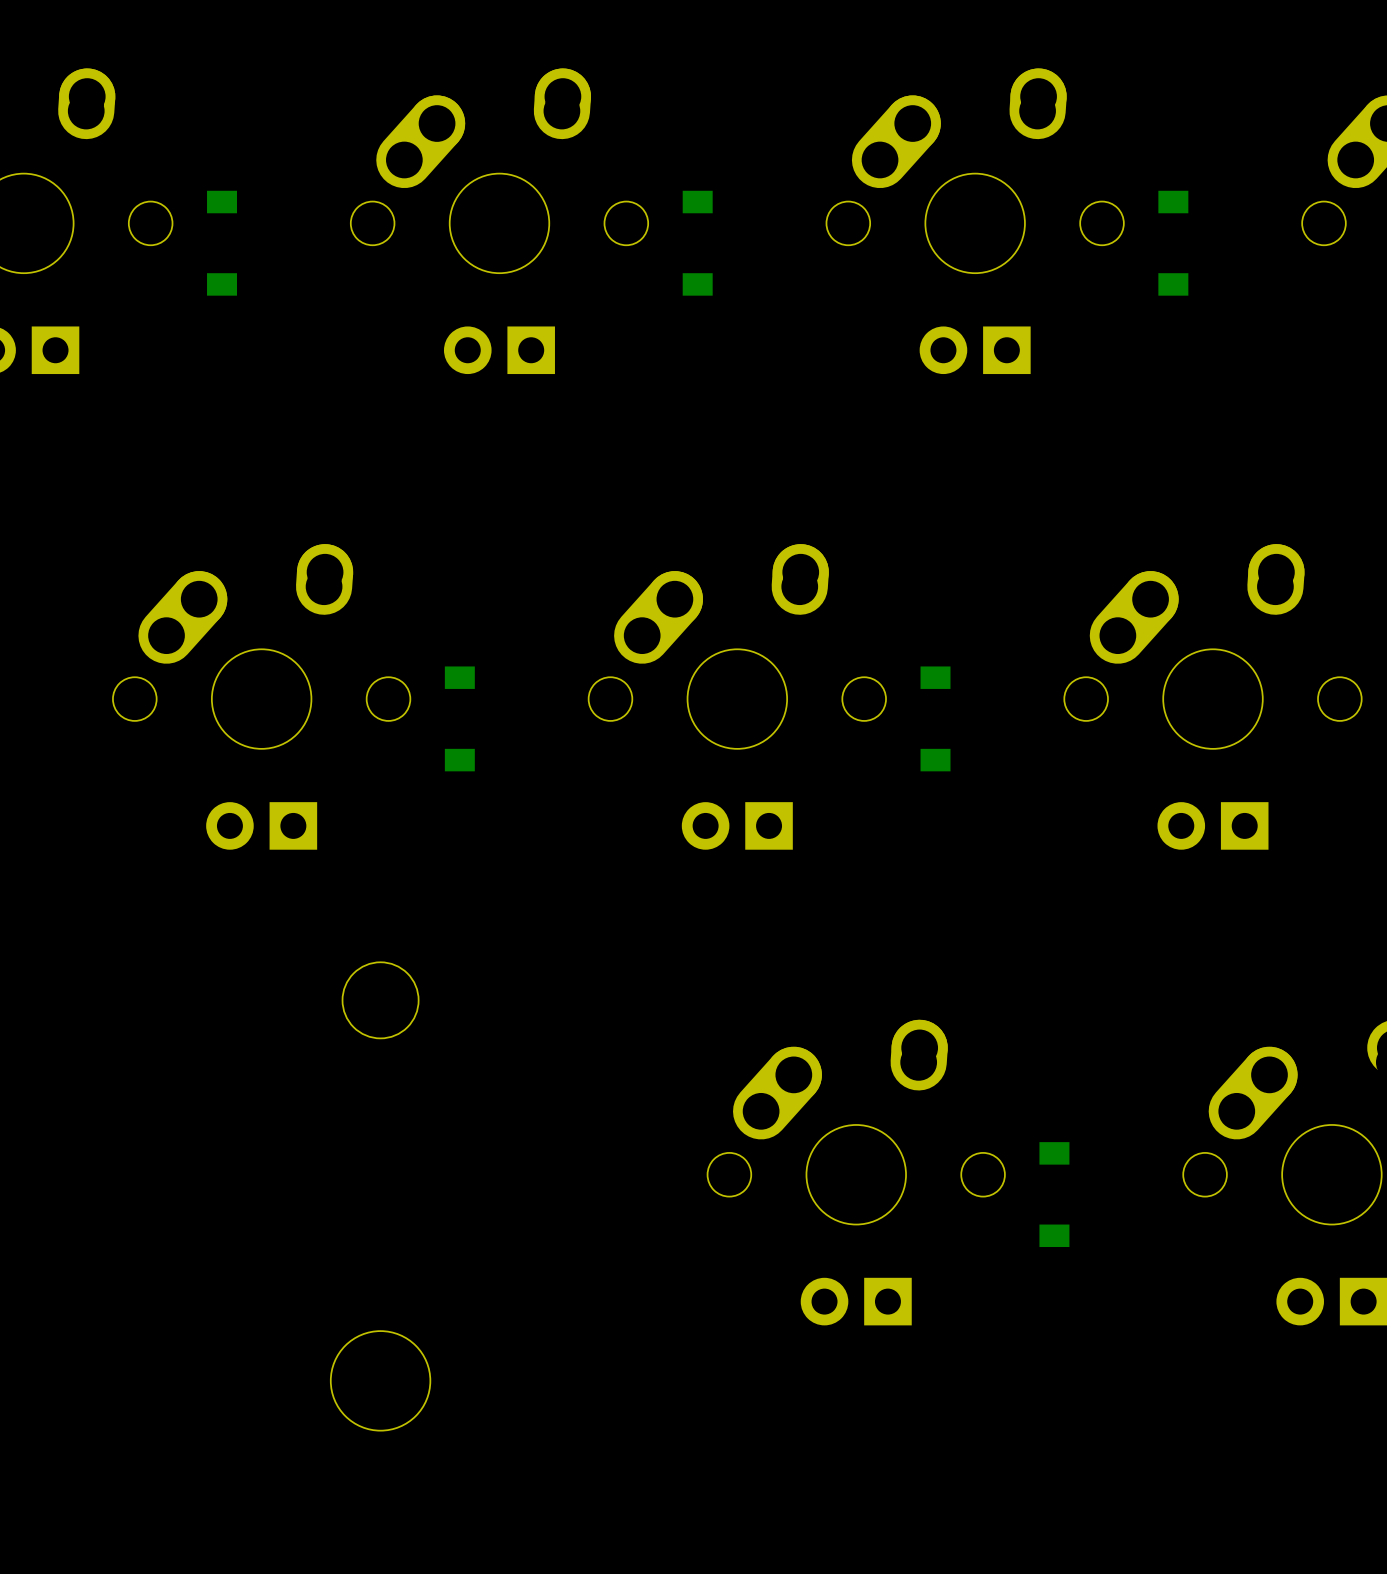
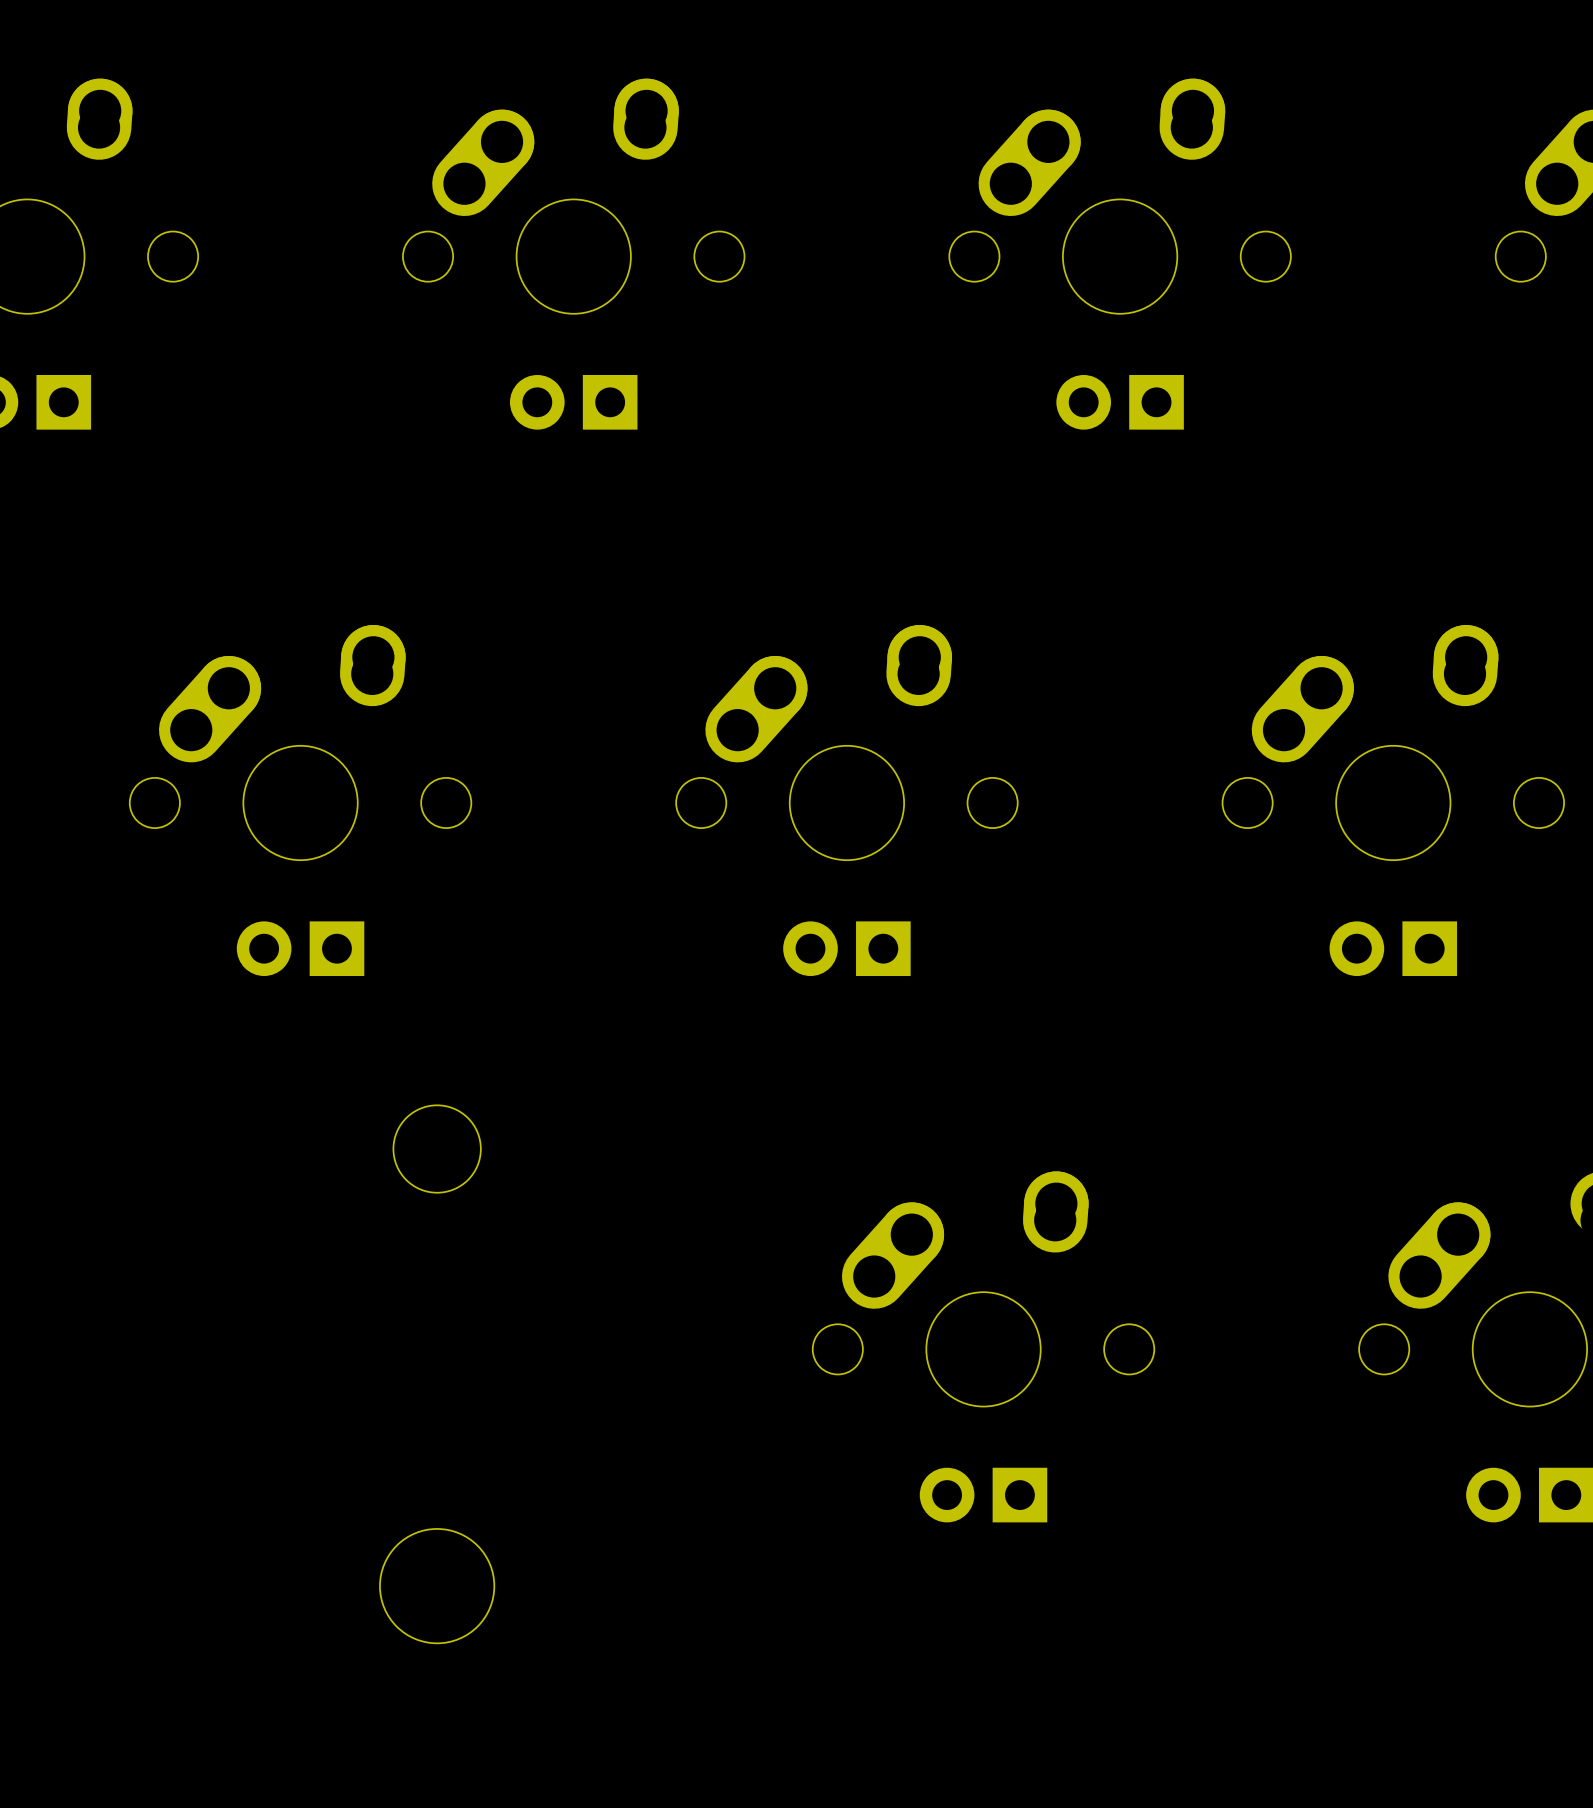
part: (222, 243) -> none
part: (697, 243) -> none
part: (1173, 243) -> none
part: (459, 718) -> none
part: (935, 718) -> none
part: (1054, 1194) -> none

